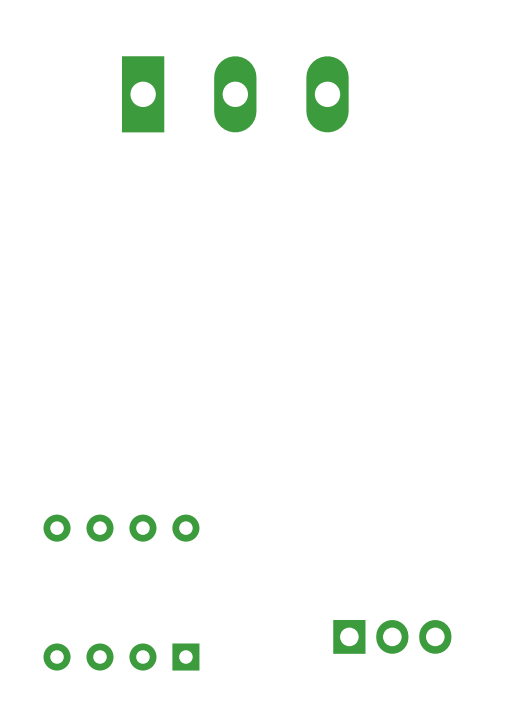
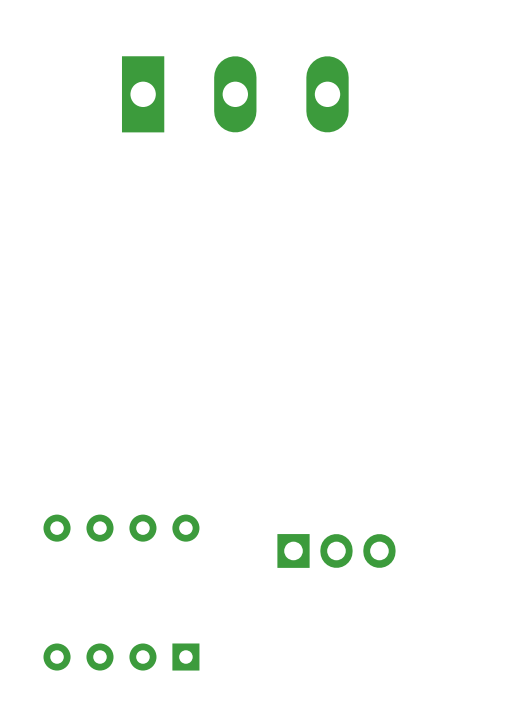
part position: (392, 636) -> (336, 550)

